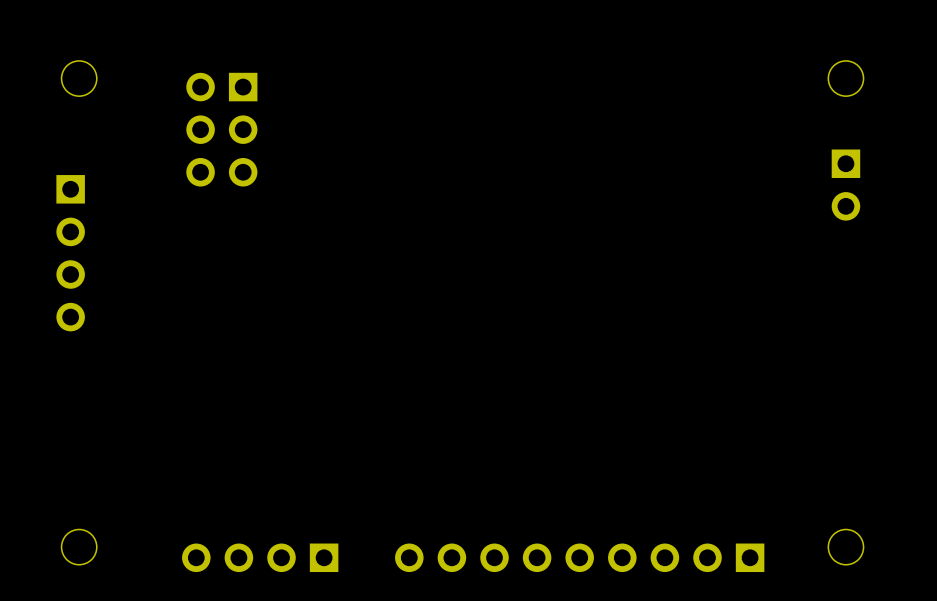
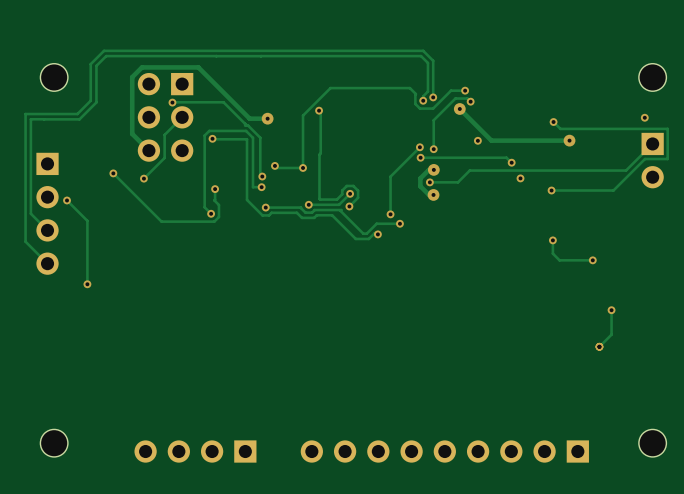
track: none -> (465, 90) (451, 90) (433, 108) (419, 108) (415, 103) (415, 94) (409, 88) (330, 88) (303, 115) (303, 167) (277, 167) (274, 165)
via: none -> (465, 90)
track: none -> (433, 97) (433, 60) (423, 50) (104, 50) (90, 64) (90, 100) (77, 114) (25, 114) (25, 241) (47, 263)
via: none -> (433, 97)
track: none -> (423, 100) (423, 96) (427, 91) (427, 63) (421, 56) (106, 56) (96, 65) (96, 102) (79, 119) (44, 119)
via: none -> (423, 100)
track: none -> (470, 101) (467, 98) (455, 98) (433, 120) (433, 149)
via: none -> (470, 101)
track: none -> (172, 102) (223, 102) (260, 137) (260, 174) (262, 176)
via: none -> (172, 102)
track: none -> (459, 108) (491, 140) (569, 140)
via: none -> (459, 108)
track: none -> (319, 110) (320, 112) (319, 198) (336, 199) (346, 185) (353, 185) (358, 190) (358, 197) (349, 206)
via: none -> (319, 110)
track: none -> (182, 117) (164, 134) (164, 157) (143, 178)
via: none -> (644, 117)
track: none -> (267, 118) (249, 118) (198, 67) (142, 67) (132, 77) (132, 133) (148, 150)
via: none -> (267, 118)
track: none -> (44, 119) (30, 119) (30, 213) (47, 230)
track: none -> (553, 122) (560, 128) (667, 128) (667, 159) (645, 159) (613, 190) (551, 190)
via: none -> (553, 122)
track: none -> (212, 138) (247, 139) (247, 199) (262, 215) (269, 215) (271, 212) (296, 212) (301, 217) (332, 215) (355, 238) (368, 238) (374, 233) (377, 234)
via: none -> (212, 138)
via: none -> (477, 140)
via: none -> (569, 140)
track: none -> (652, 143) (626, 170) (469, 170) (457, 182) (429, 182)
track: none -> (419, 147) (390, 176) (390, 214)
via: none -> (419, 147)
via: none -> (433, 149)
track: none -> (420, 157) (506, 157) (511, 162)
via: none -> (420, 157)
via: none -> (511, 162)
via: none -> (274, 165)
via: none -> (303, 167)
track: none -> (433, 169) (428, 169) (420, 178) (420, 186) (429, 194) (433, 194)
via: none -> (433, 169)
track: none -> (113, 173) (161, 221) (214, 221) (218, 217) (218, 205) (214, 200) (215, 189)
via: none -> (113, 173)
via: none -> (262, 176)
via: none -> (520, 178)
via: none -> (143, 178)
via: none -> (429, 182)
track: none -> (261, 187) (252, 187) (252, 137) (246, 130) (209, 130) (204, 135) (204, 207) (211, 213)
via: none -> (261, 187)
via: none -> (215, 189)
via: none -> (551, 190)
track: none -> (350, 193) (339, 204) (308, 204)
via: none -> (350, 193)
via: none -> (433, 194)
track: none -> (67, 200) (87, 220) (87, 284)
via: none -> (67, 200)
via: none -> (308, 204)
via: none -> (349, 206)
track: none -> (265, 207) (300, 207) (305, 212) (312, 212) (314, 210) (341, 210) (363, 233) (366, 233) (376, 223) (399, 223)
via: none -> (265, 207)
via: none -> (211, 213)
via: none -> (390, 214)
via: none -> (399, 223)
via: none -> (377, 234)
track: none -> (552, 240) (552, 253) (559, 260) (592, 260)
via: none -> (552, 240)
via: none -> (592, 260)
via: none -> (87, 284)
track: none -> (611, 310) (611, 334) (599, 346)
via: none -> (611, 310)
via: none -> (599, 346)

